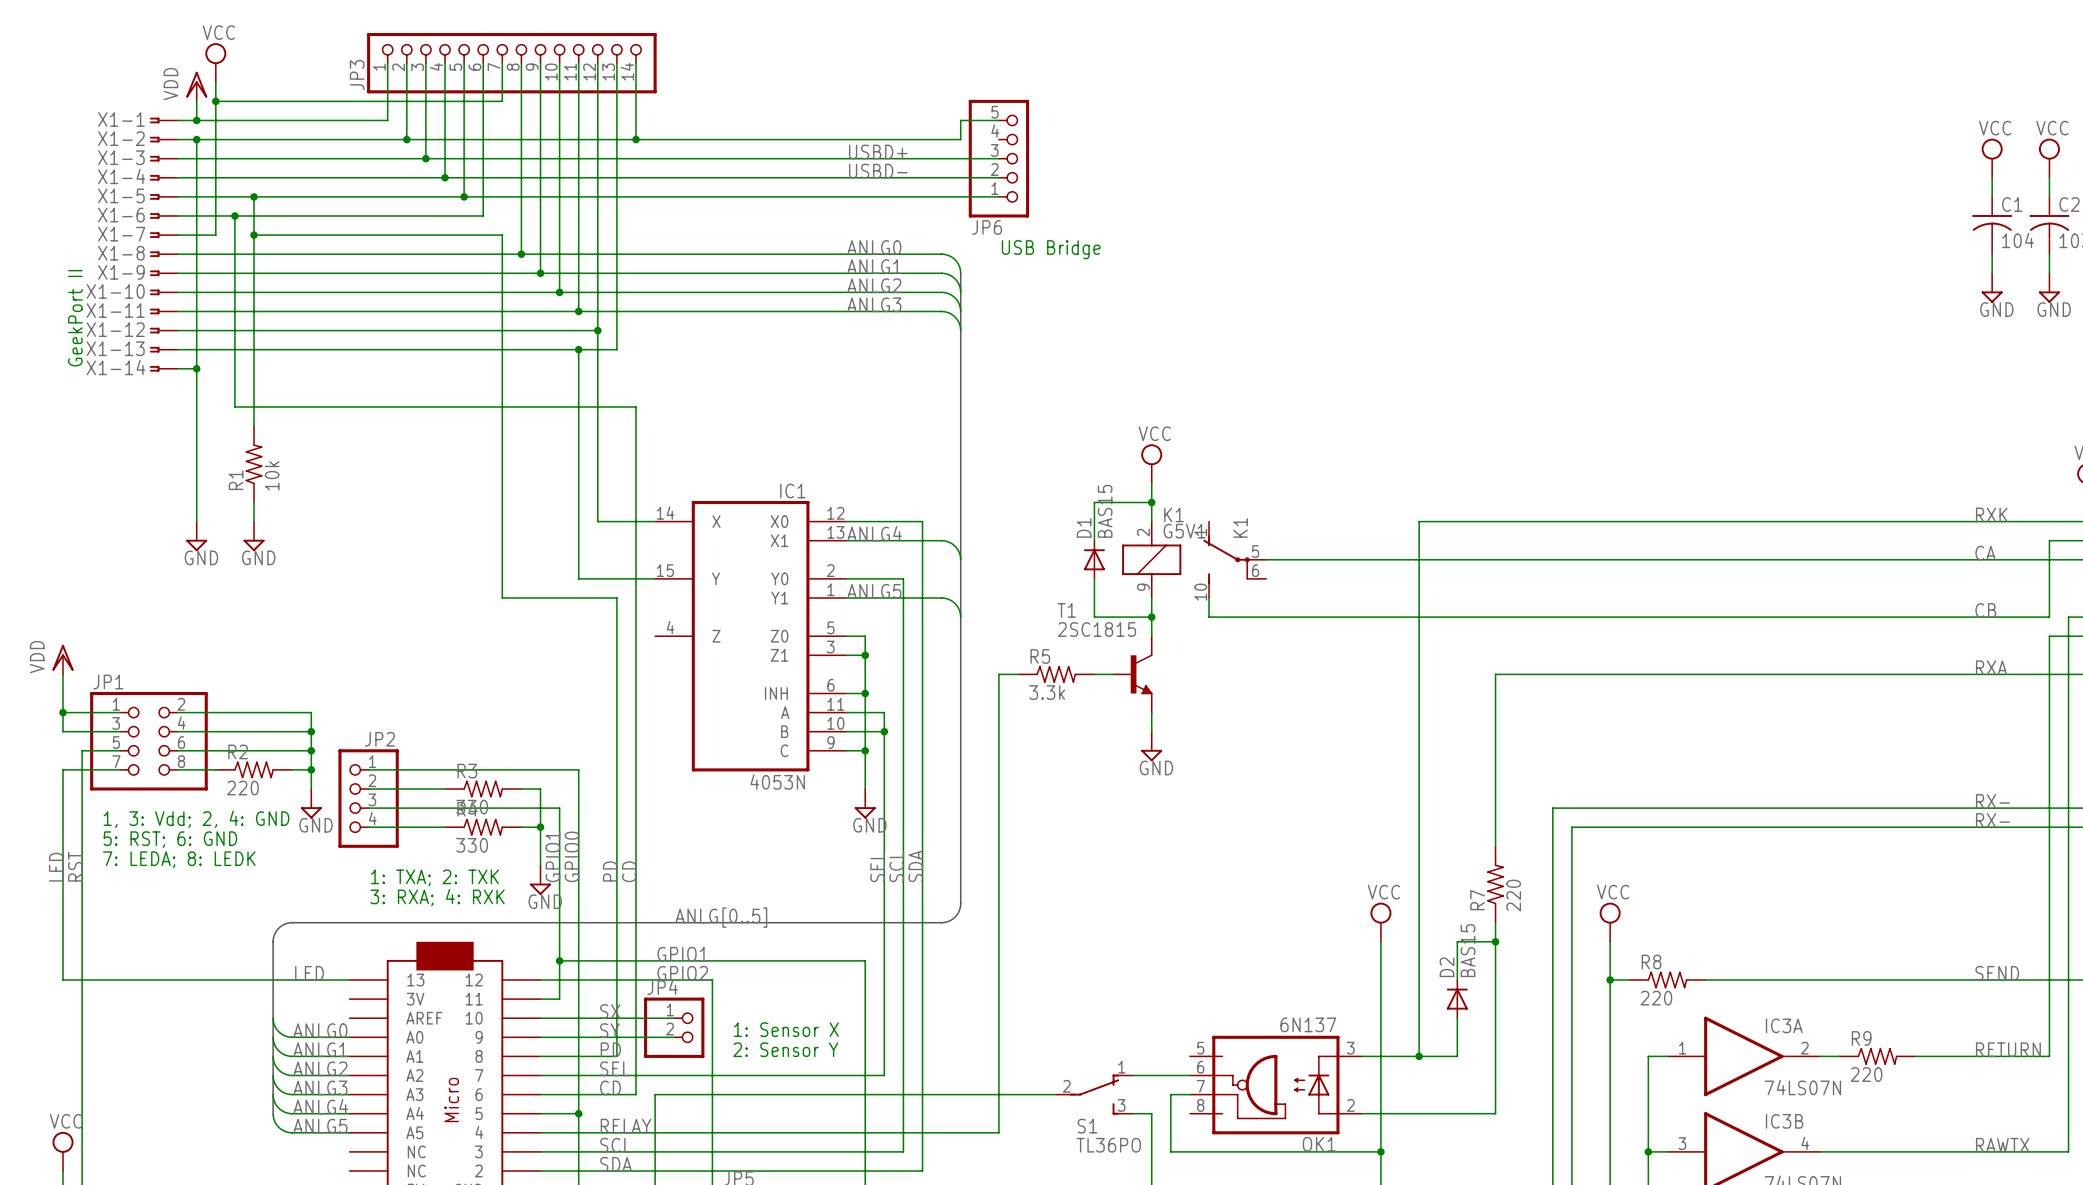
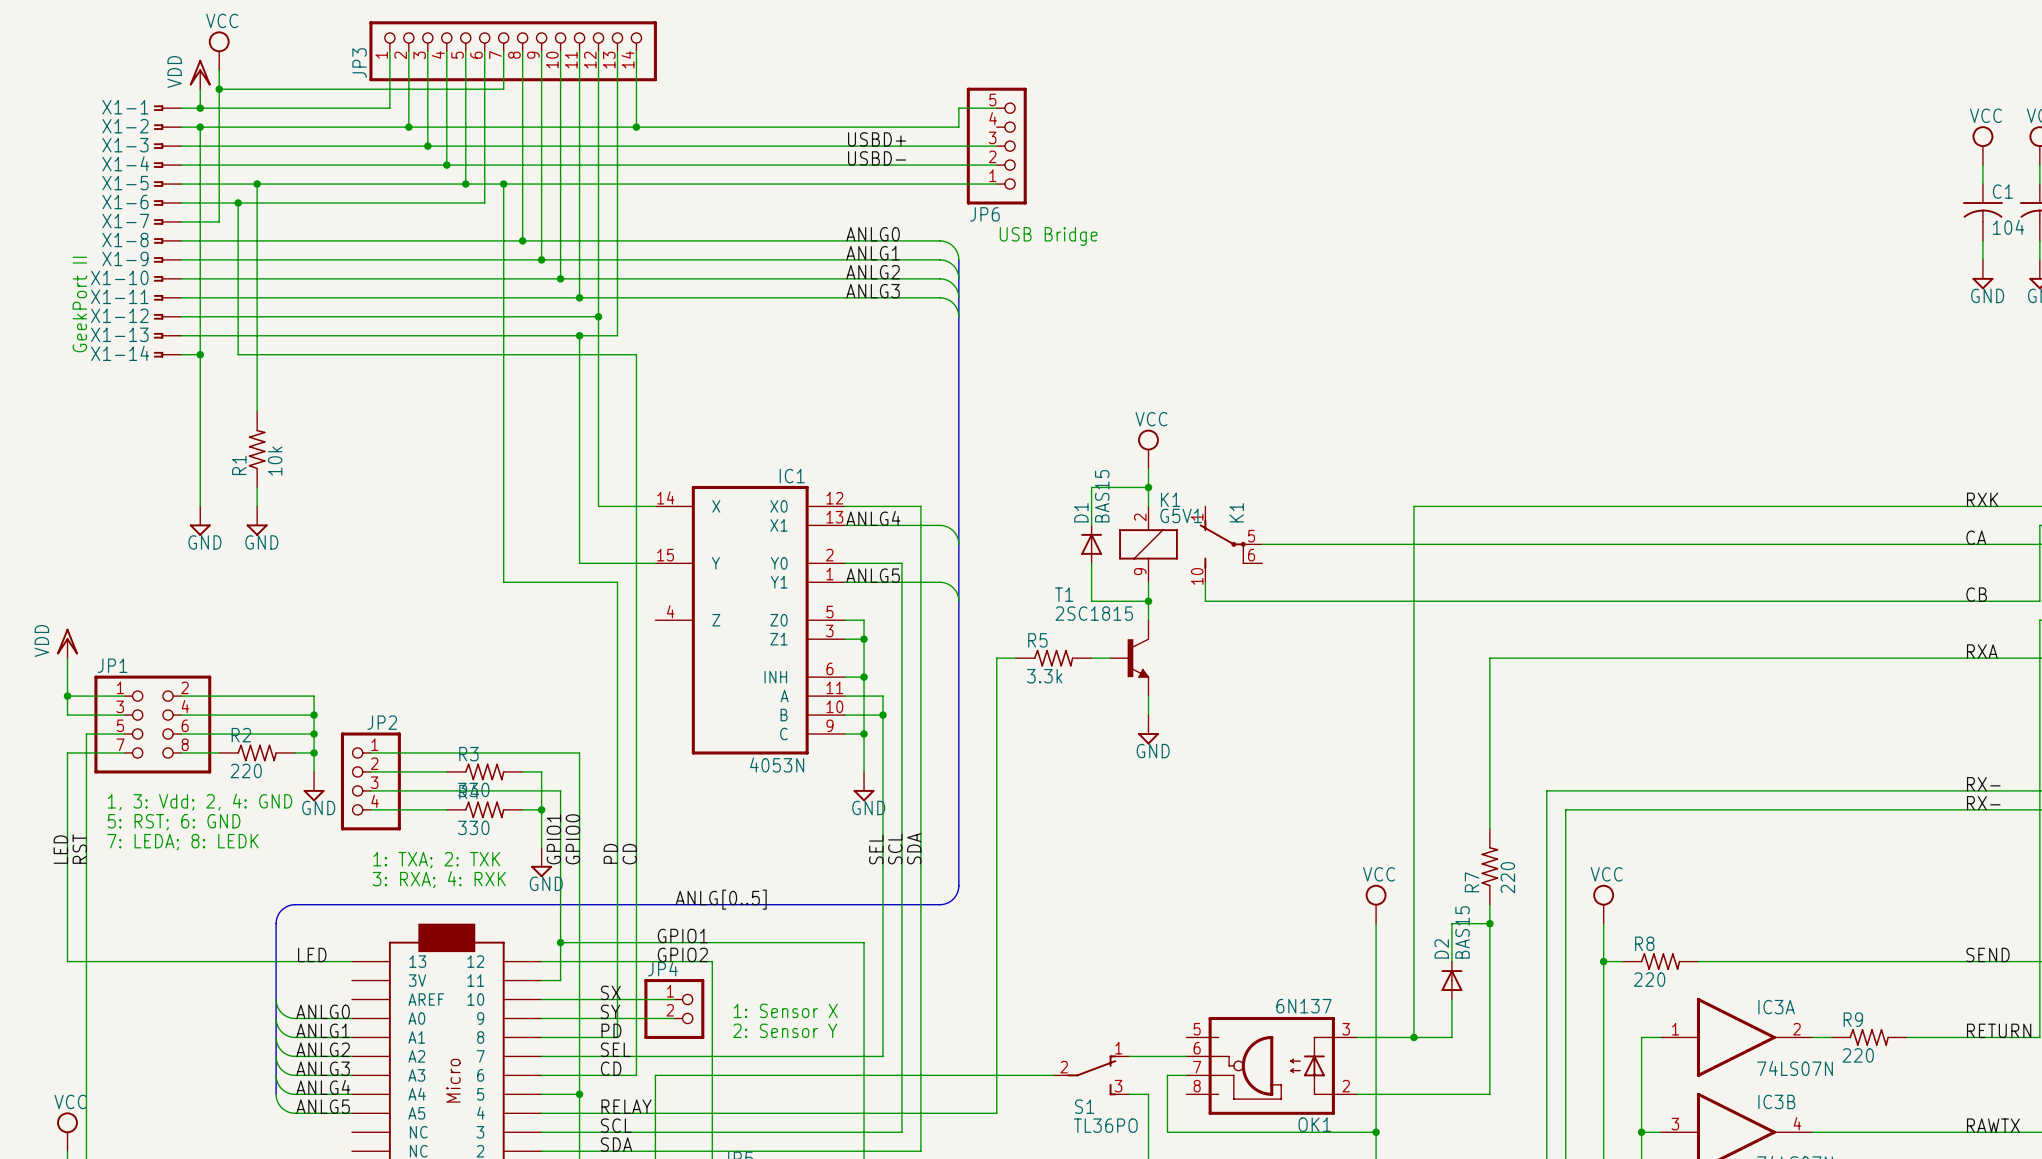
junction: none -> (503, 184)
wire: (254, 235) (502, 235) -> (503, 184) (503, 221)
junction: (254, 235) -> none
wire: (234, 368) (234, 406) (636, 406) -> (238, 354) (636, 354) (636, 392)

